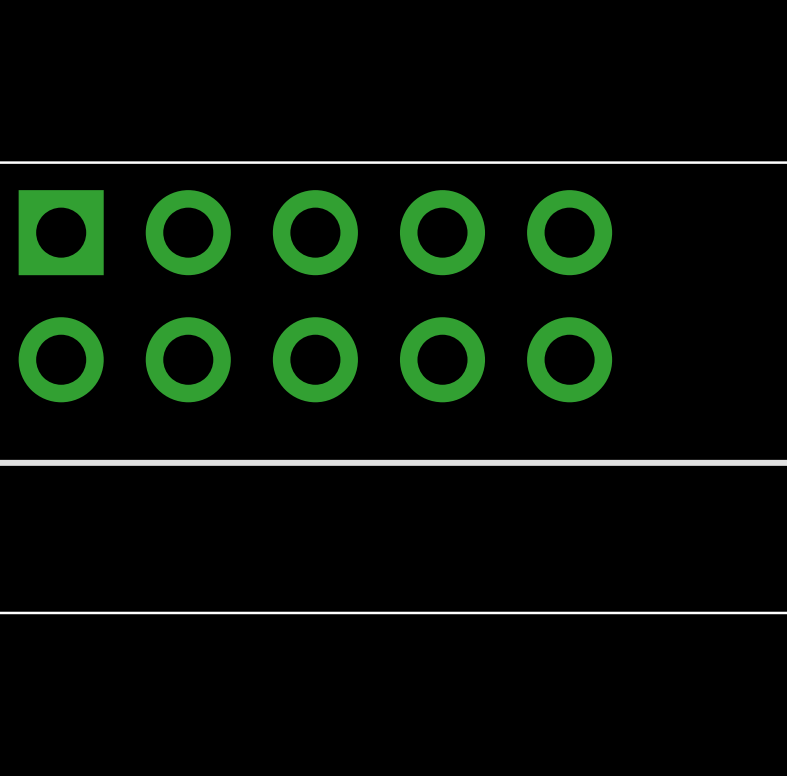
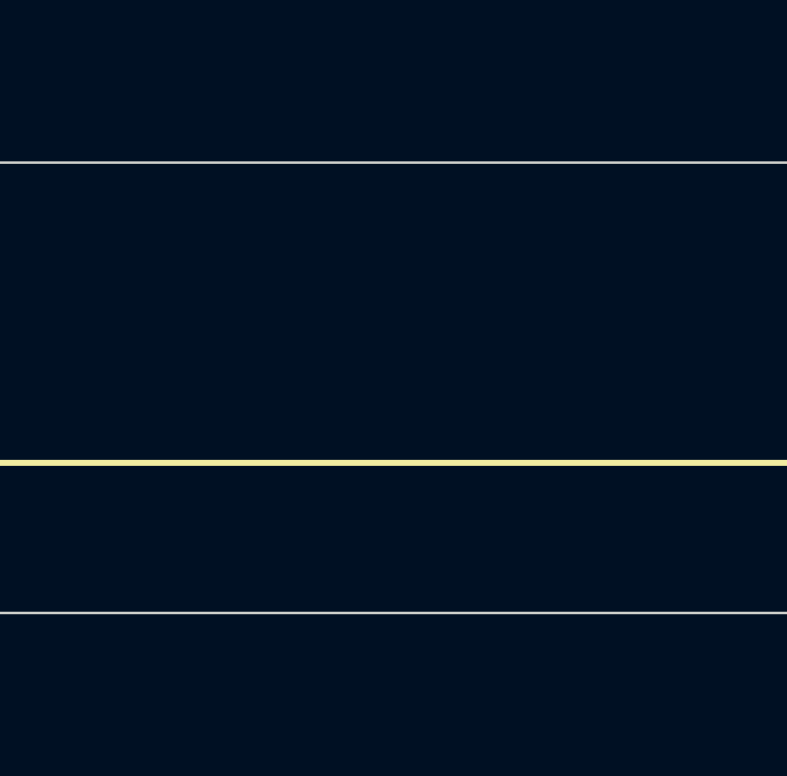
part: (315, 296) -> none

